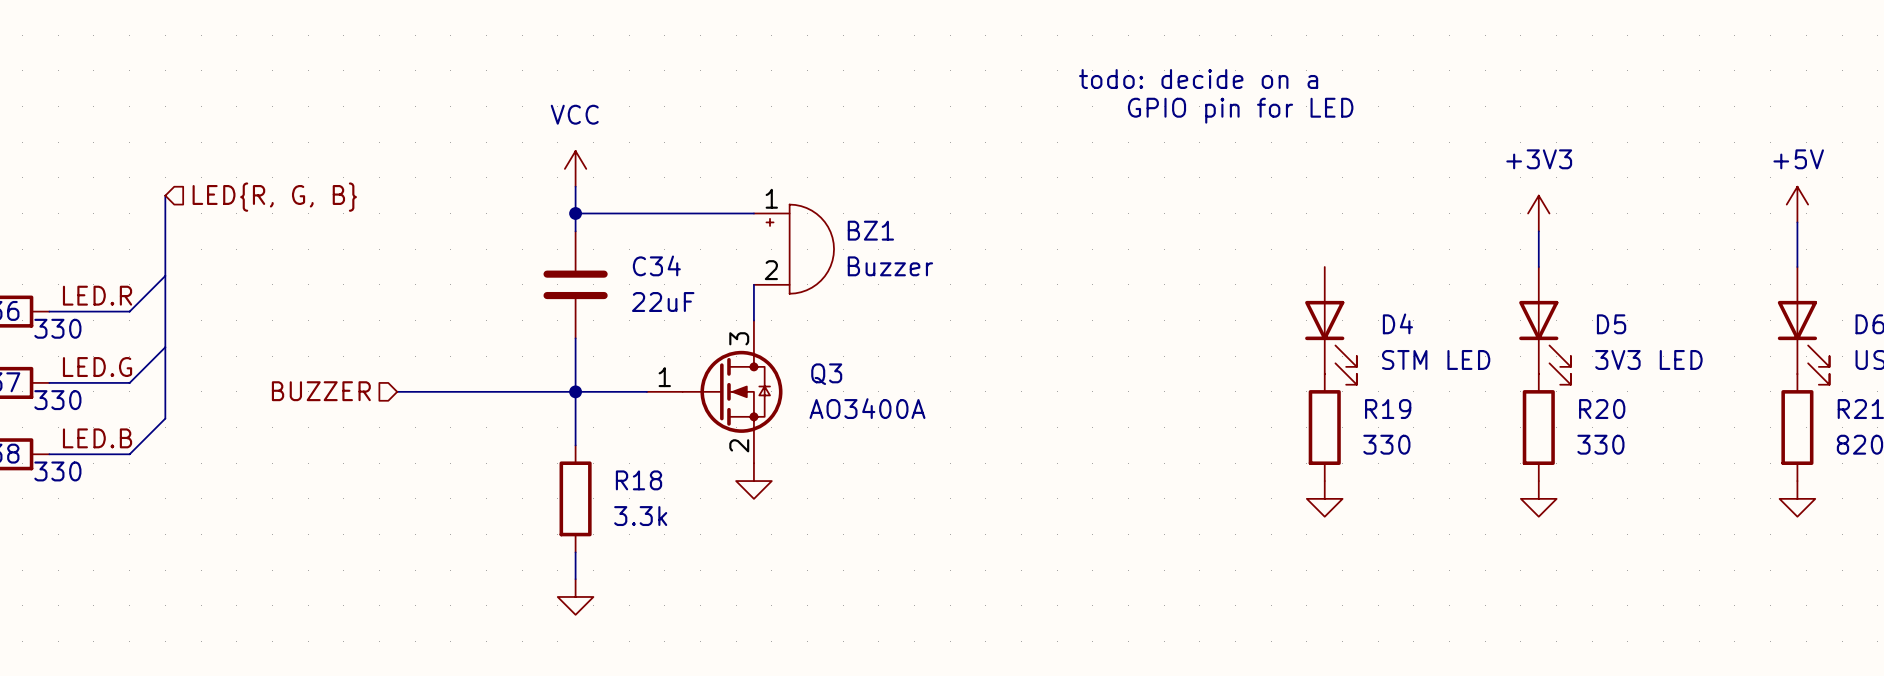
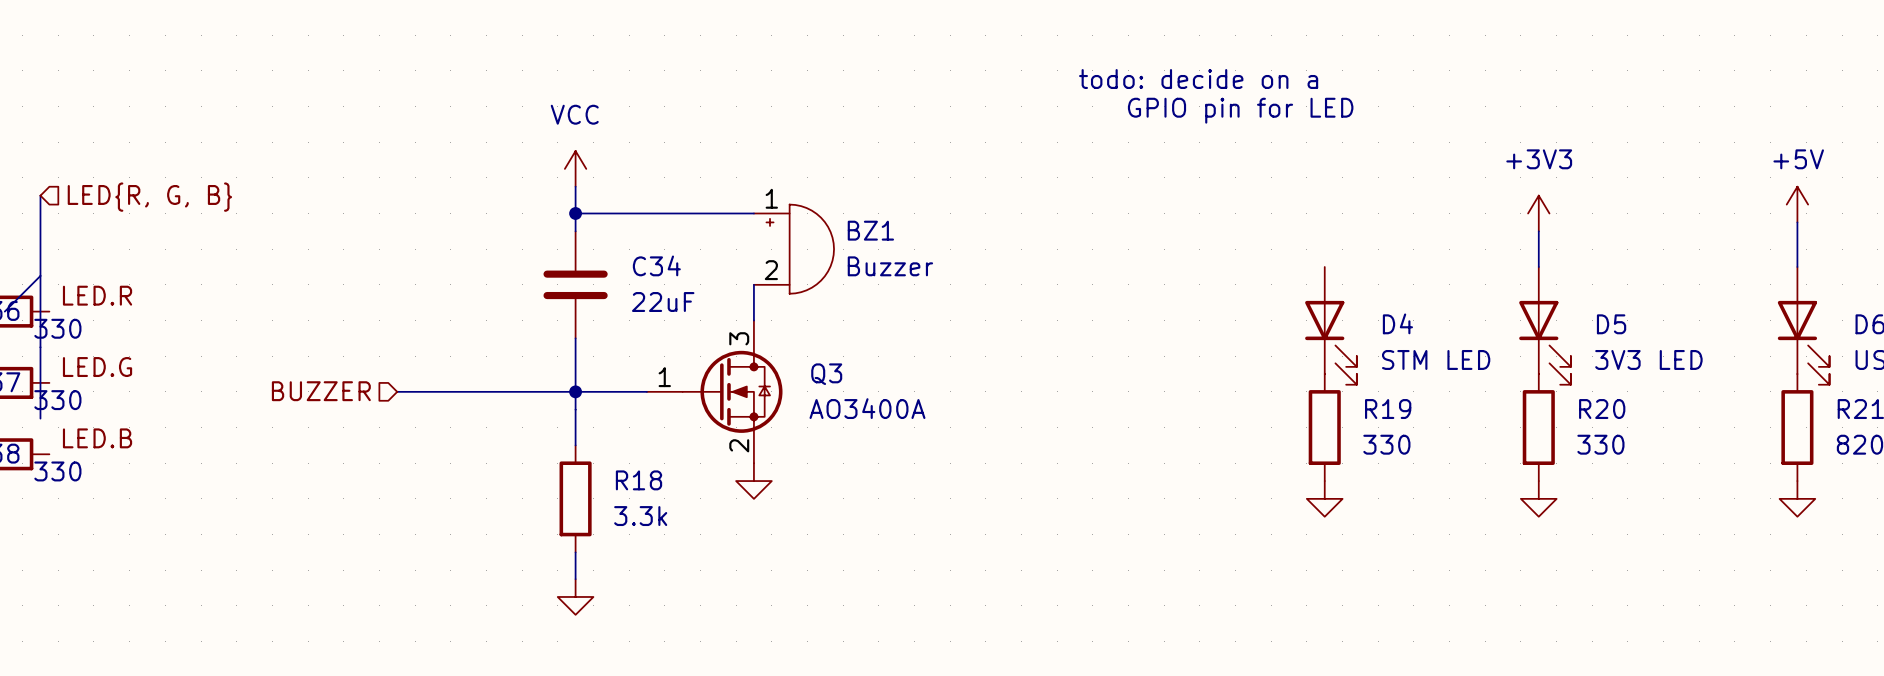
bus: (165, 195) (165, 418) -> (40, 195) (40, 418)
hierarchical label position: LED{R, G, B} (274, 197) -> LED{R, G, B} (149, 197)
wire: (165, 275) (129, 311) -> (40, 275) (4, 311)
wire: (49, 311) (129, 311) -> none
wire: (165, 347) (129, 382) (49, 382) -> none
wire: (165, 418) (129, 454) (49, 454) -> none

